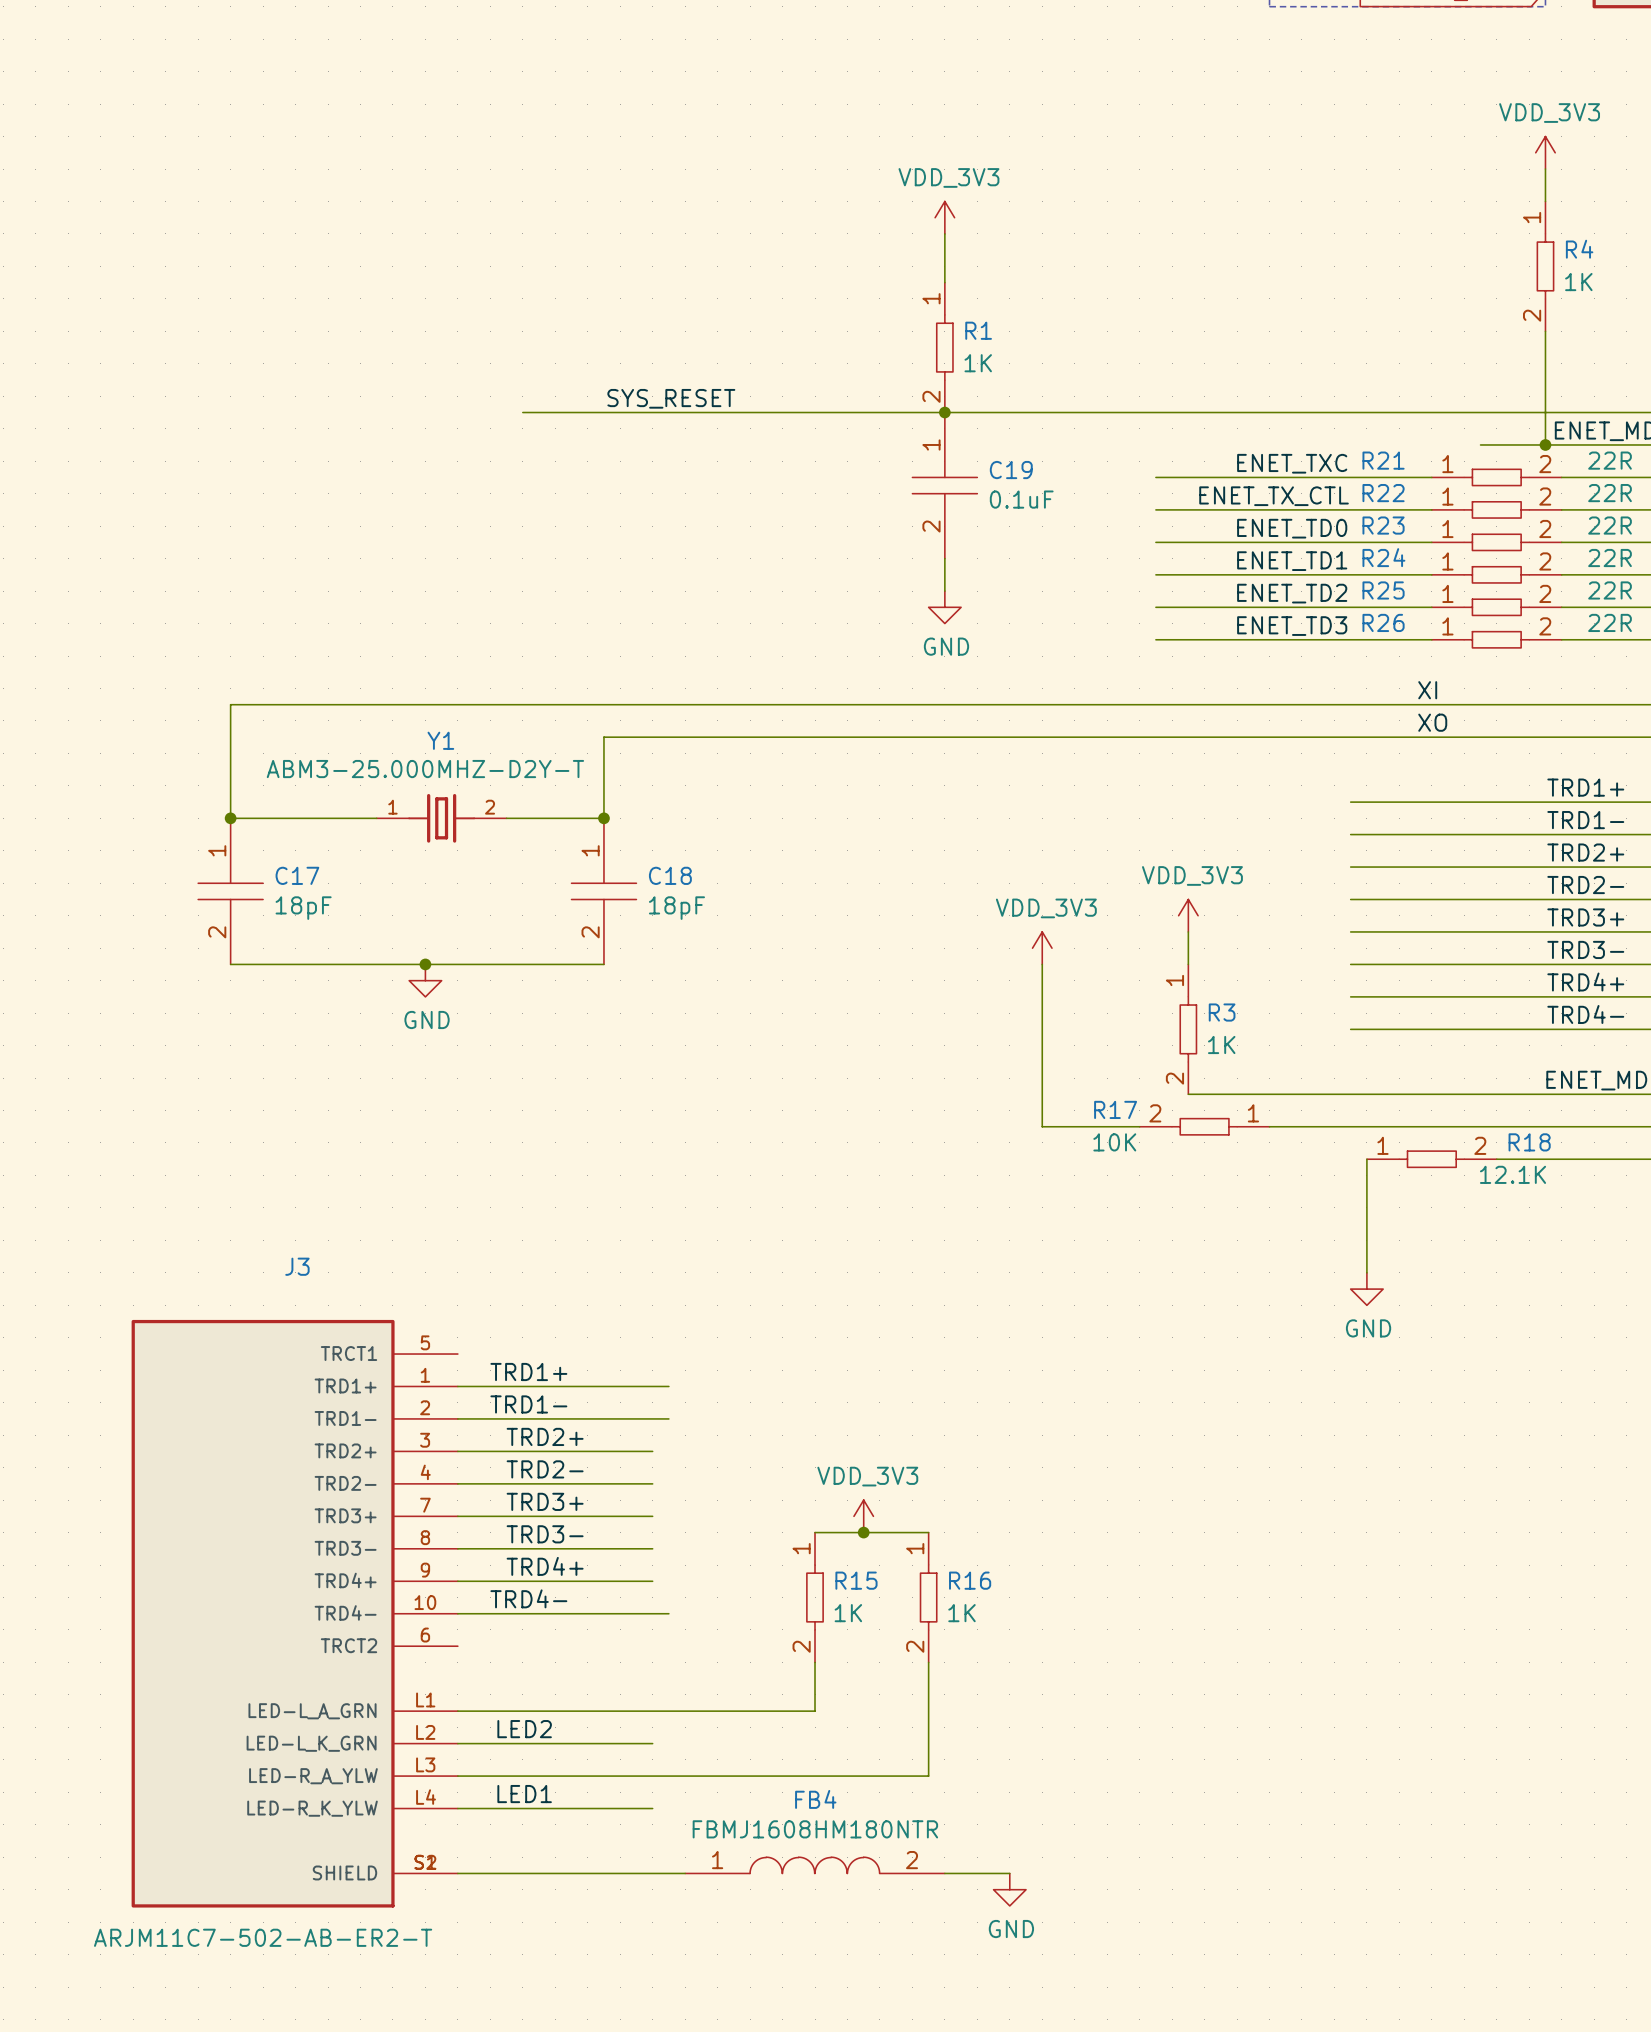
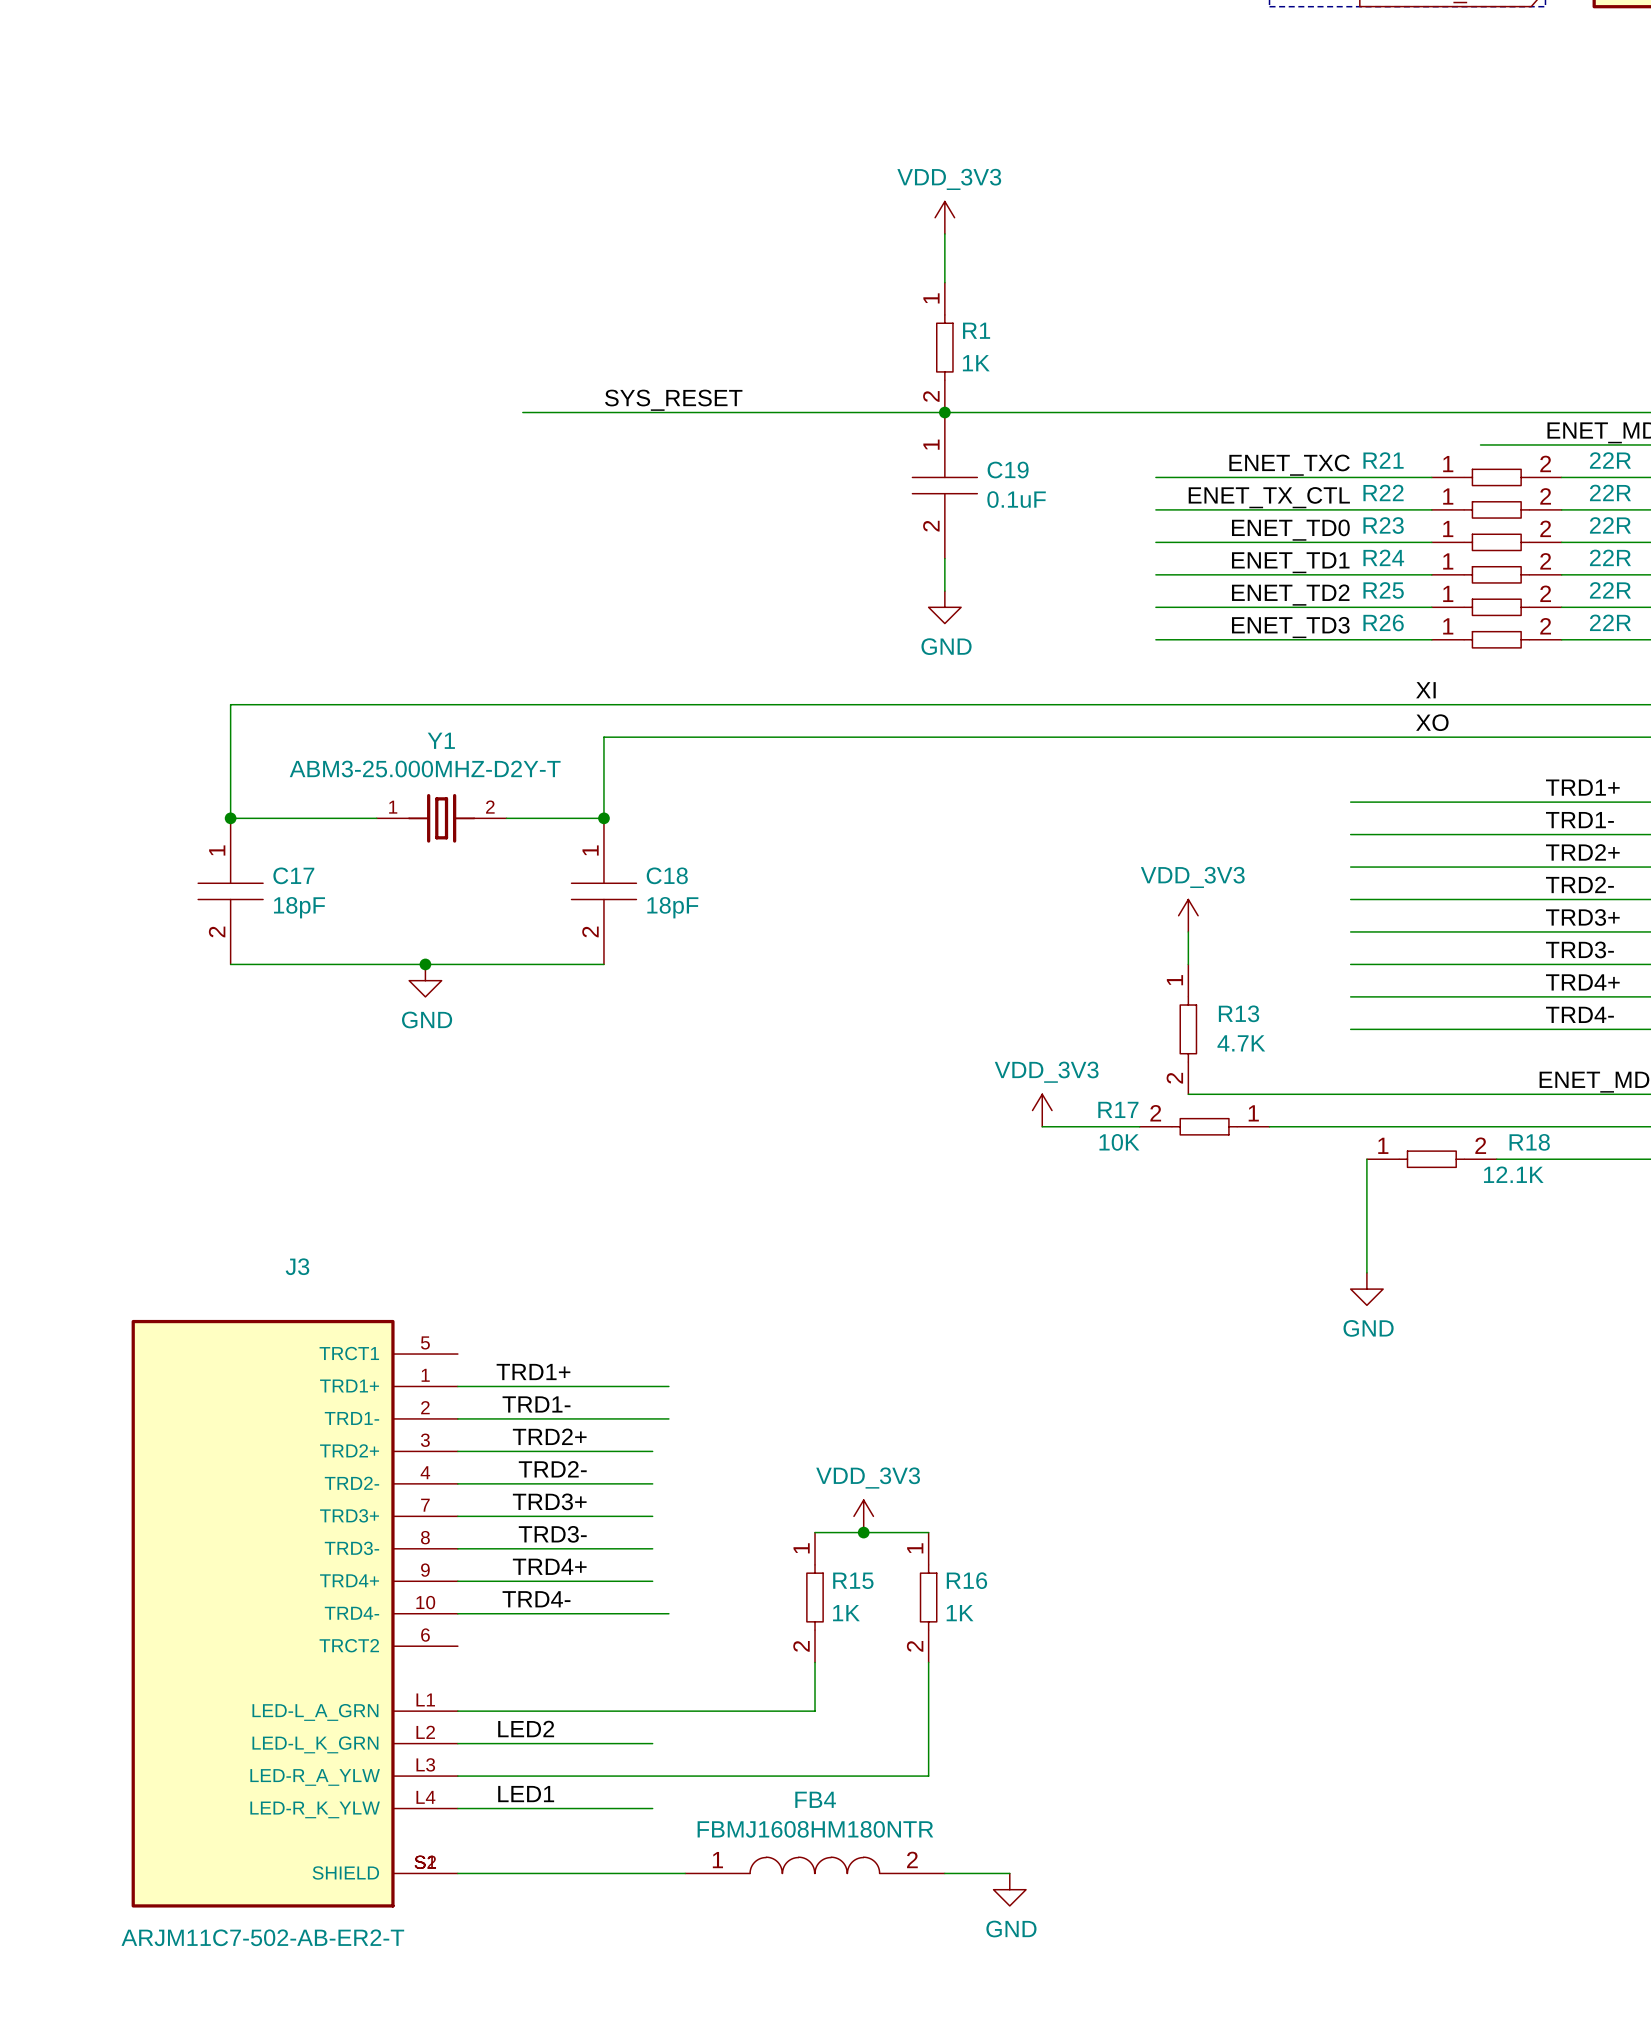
power symbol: VDD_3V3 (1545, 152) -> none
wire: (1545, 169) (1545, 201) -> none
R4: (1545, 266) -> none
wire: (1545, 331) (1545, 444) -> none
junction: (1545, 444) -> none
power symbol position: VDD_3V3 (1042, 948) -> VDD_3V3 (1042, 1110)
wire: (1042, 964) (1042, 1126) -> none
R3 name: R3 (1222, 1012) -> R13 (1239, 1013)
R3 text: 1K (1221, 1044) -> 4.7K (1241, 1043)

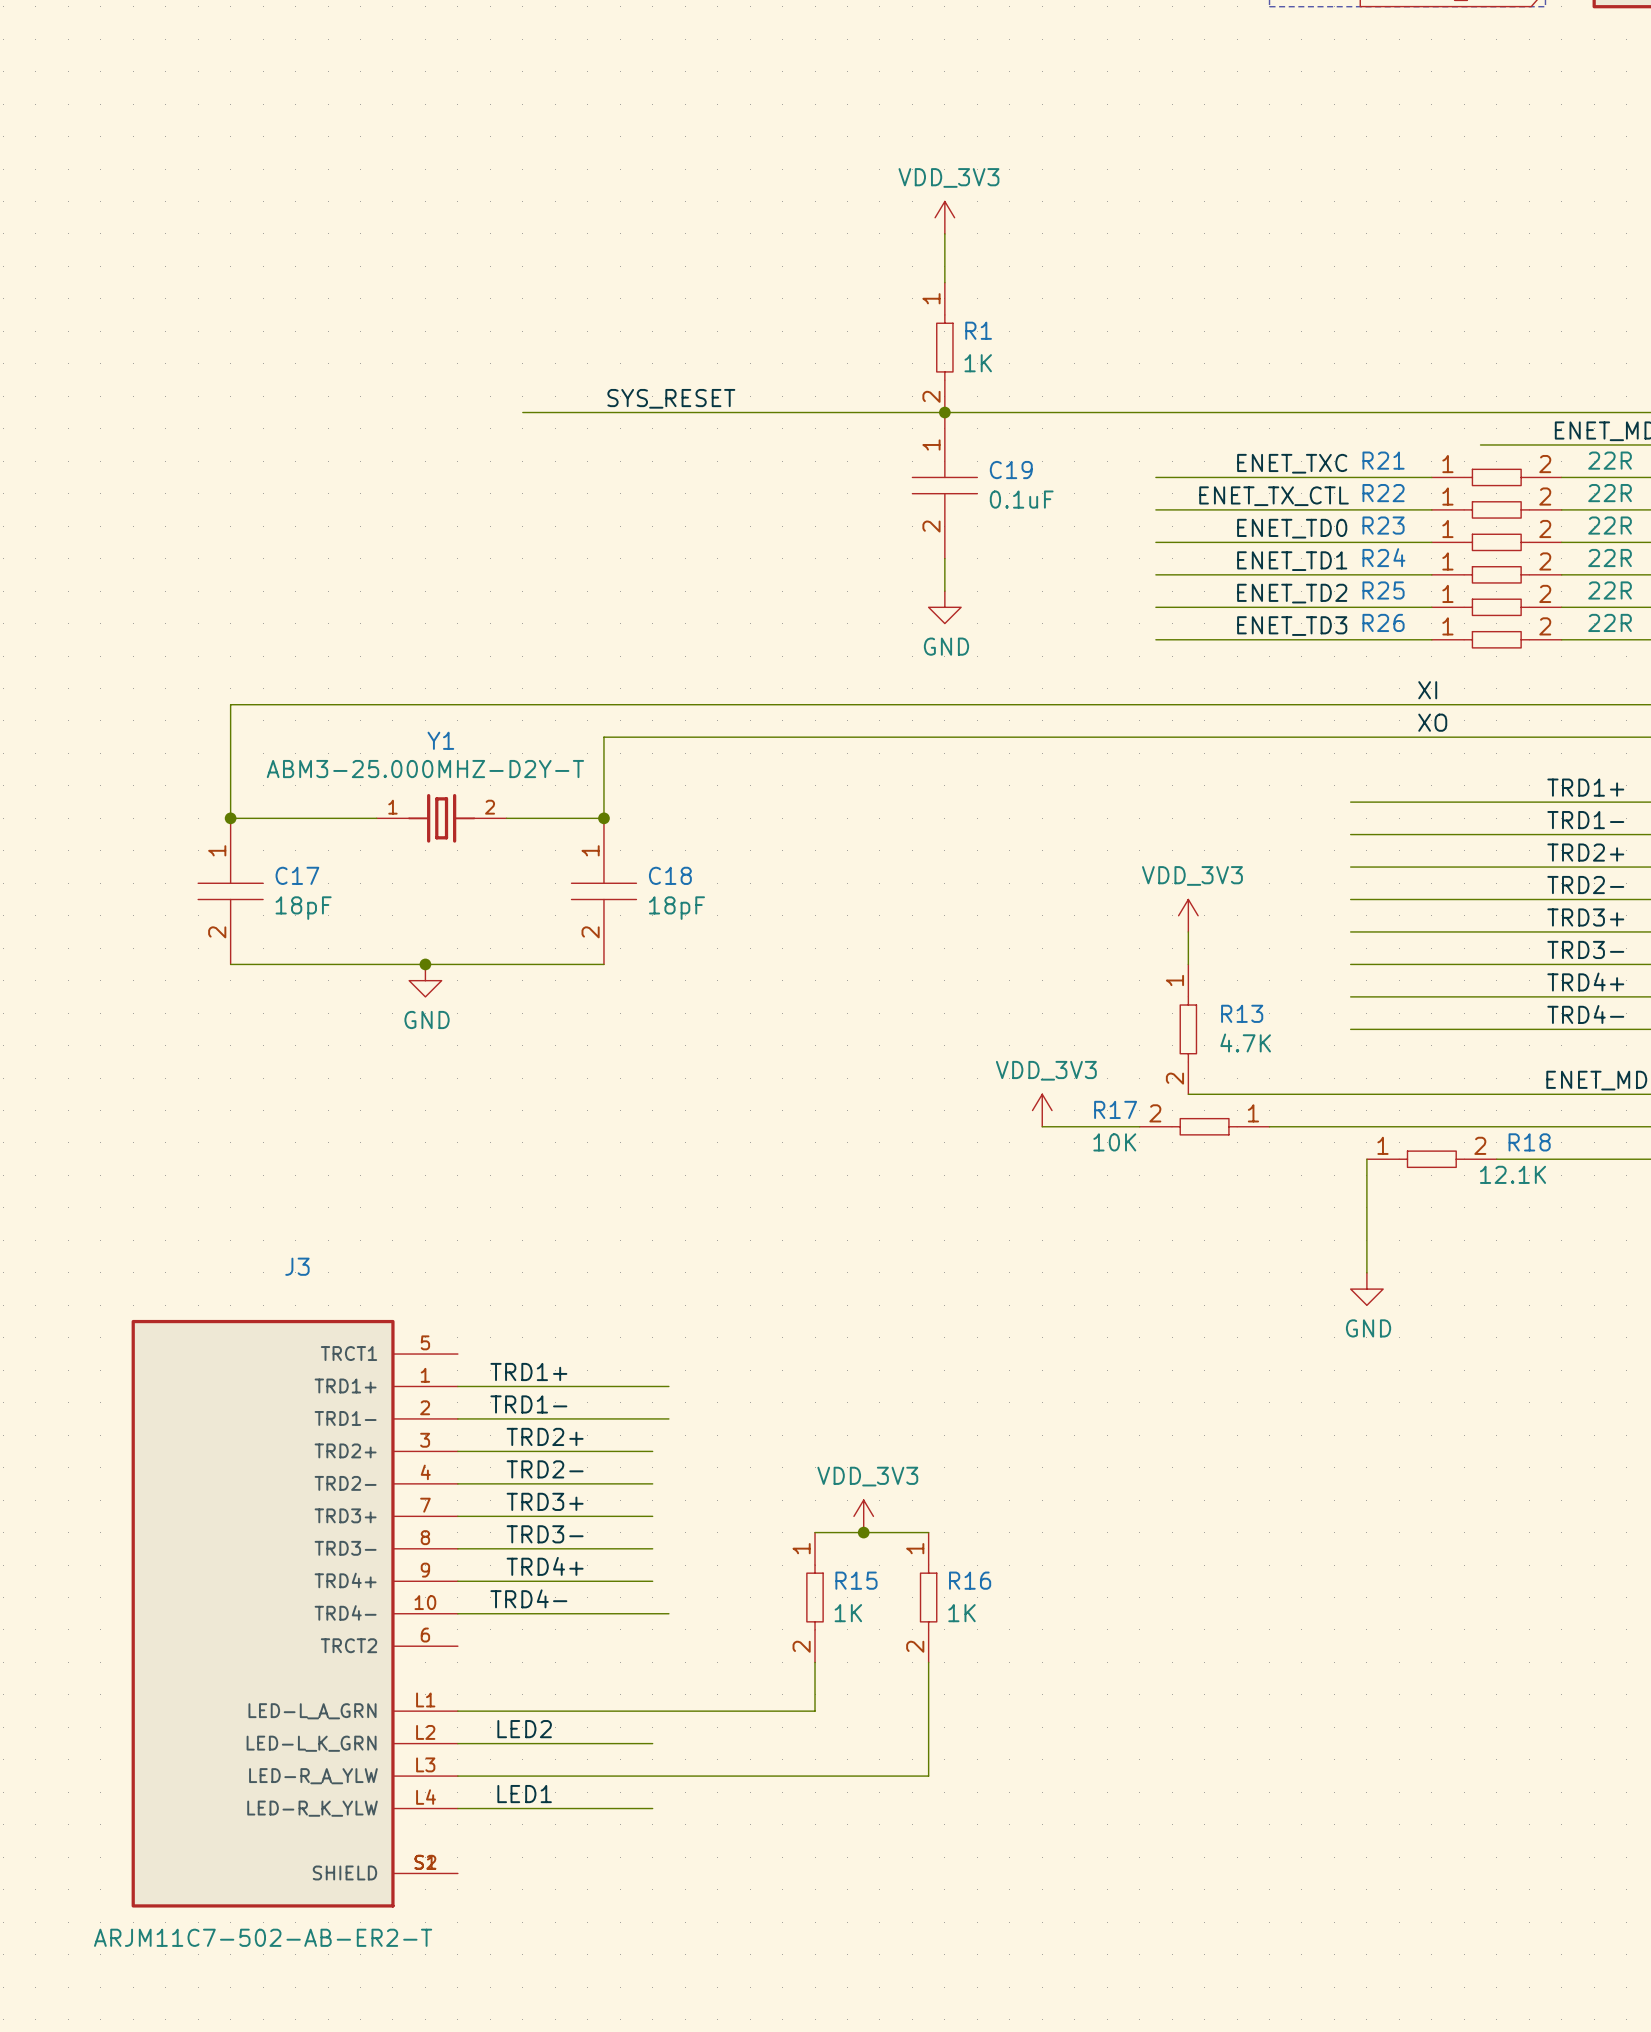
FB4: (815, 1865) -> none
wire: (457, 1873) (685, 1873) -> none
wire: (944, 1873) (1009, 1873) -> none
power symbol: GND (1009, 1889) -> none

